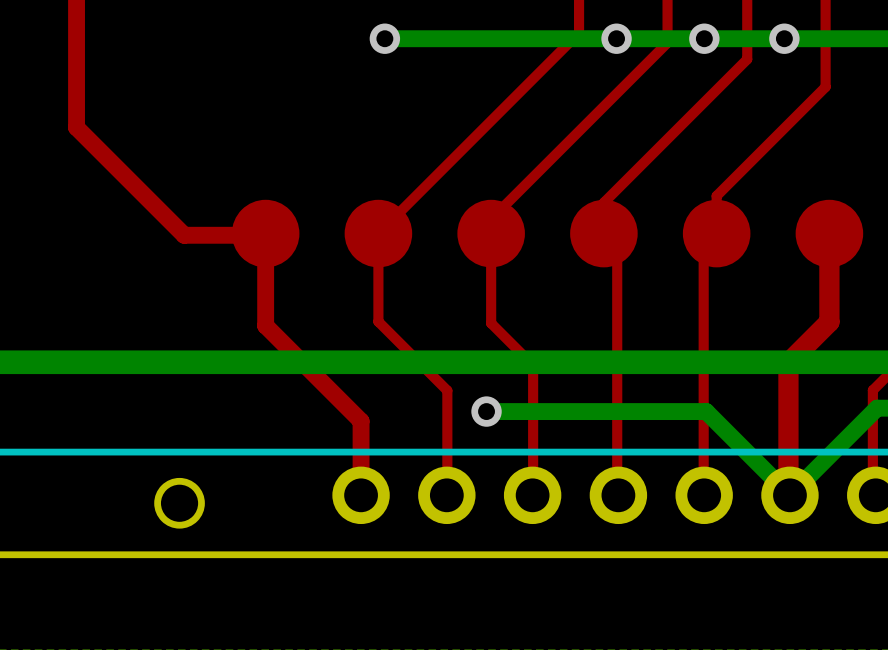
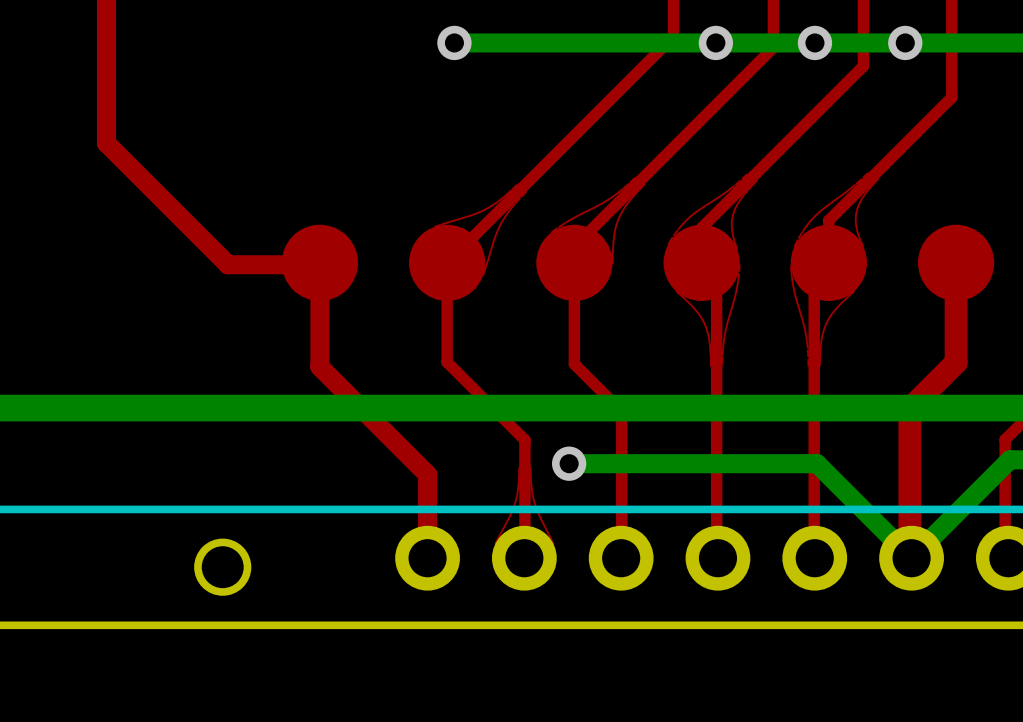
top zone outline: none -> (870, 170) (814, 216) (802, 231) (794, 246) (828, 281) (863, 246) (857, 231) (855, 217) (860, 201) (878, 179) (870, 170)
top zone outline: none -> (749, 172) (728, 190) (687, 219) (668, 243) (700, 281) (737, 249) (732, 233) (732, 219) (738, 202) (757, 180) (749, 172)
top zone outline: none -> (636, 176) (611, 197) (551, 232) (565, 279) (612, 264) (613, 238) (618, 219) (626, 205) (644, 184) (636, 176)
top zone outline: none -> (518, 183) (500, 199) (485, 209) (434, 226) (433, 276) (483, 275) (500, 224) (510, 209) (526, 191) (518, 183)
top zone outline: none -> (836, 245) (790, 265) (793, 288) (805, 333) (808, 366) (819, 366) (821, 339) (825, 324) (836, 308) (854, 291) (836, 245)
top zone outline: none -> (694, 245) (676, 291) (694, 308) (705, 324) (709, 339) (710, 366) (722, 366) (725, 333) (737, 287) (739, 264) (694, 245)
top zone outline: none -> (530, 467) (534, 502) (553, 544) (524, 574) (495, 543) (515, 502) (519, 467) (530, 467)

